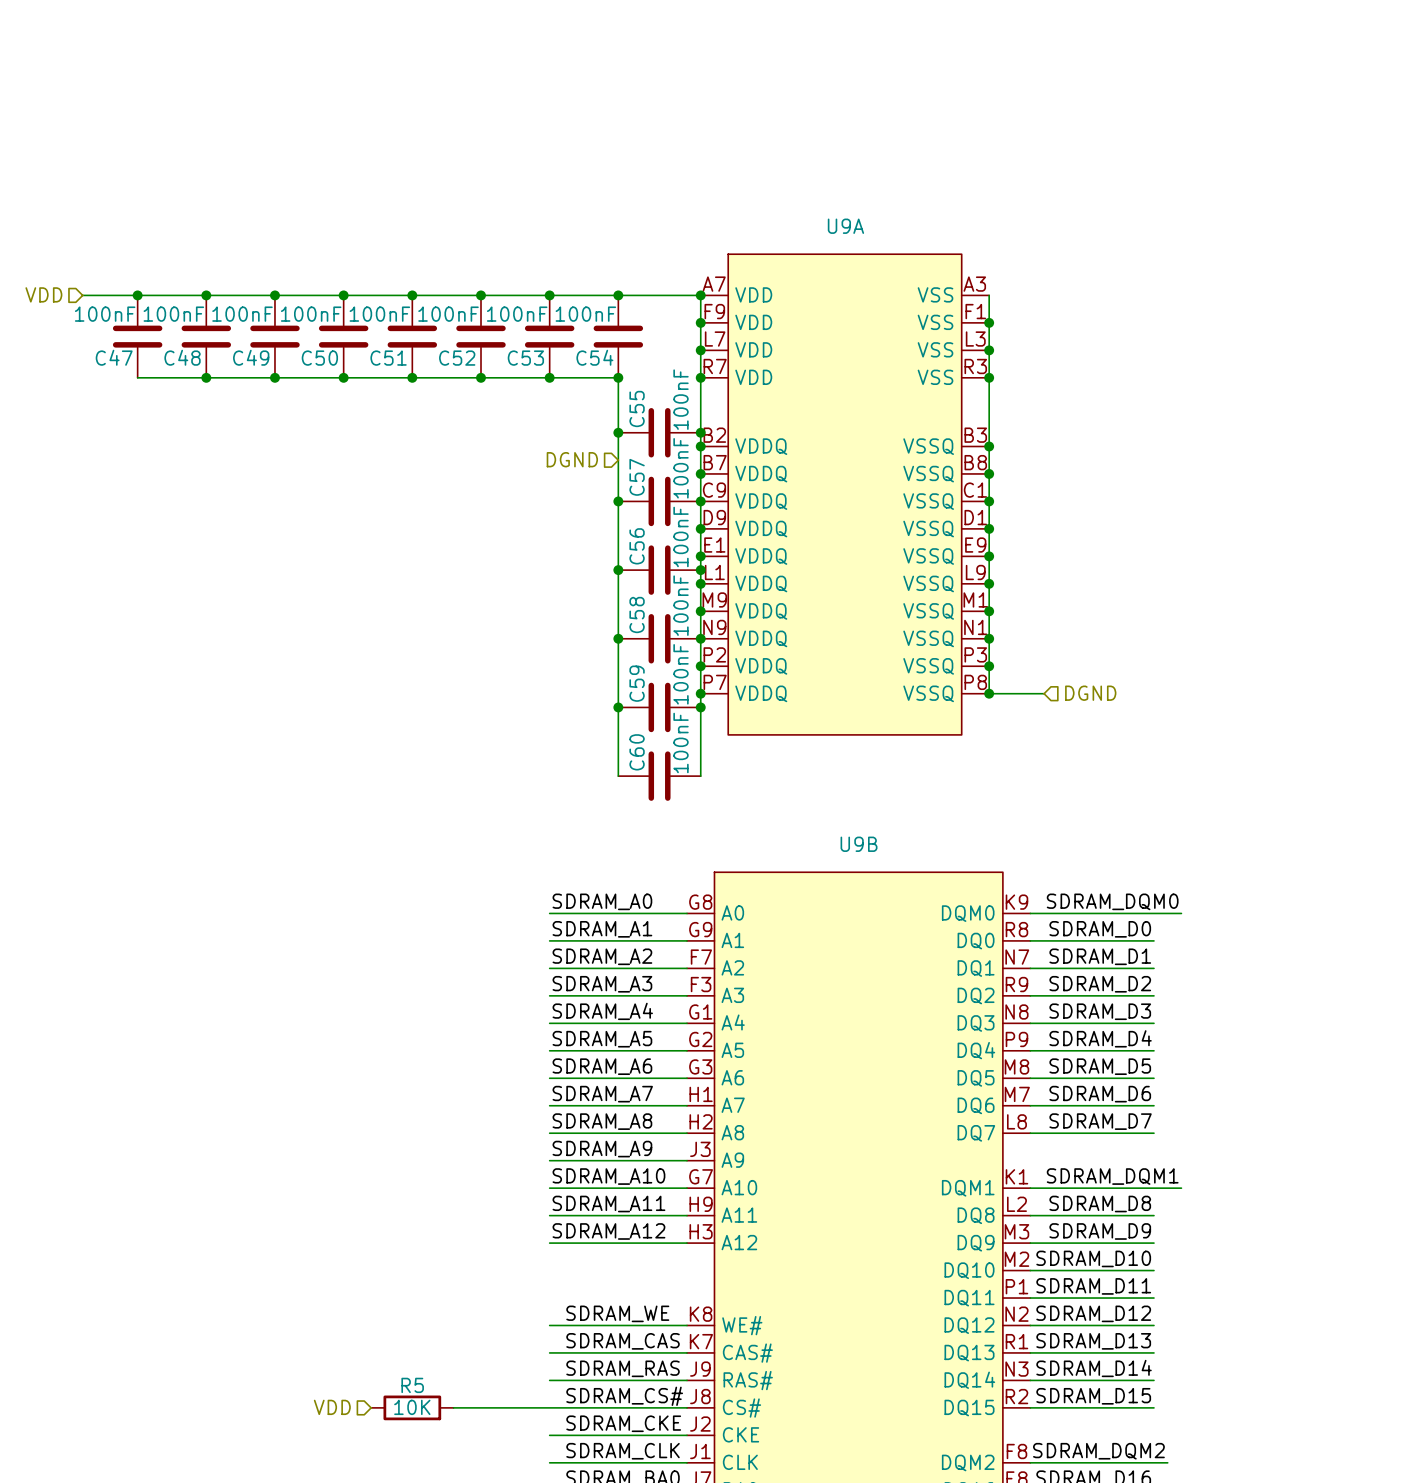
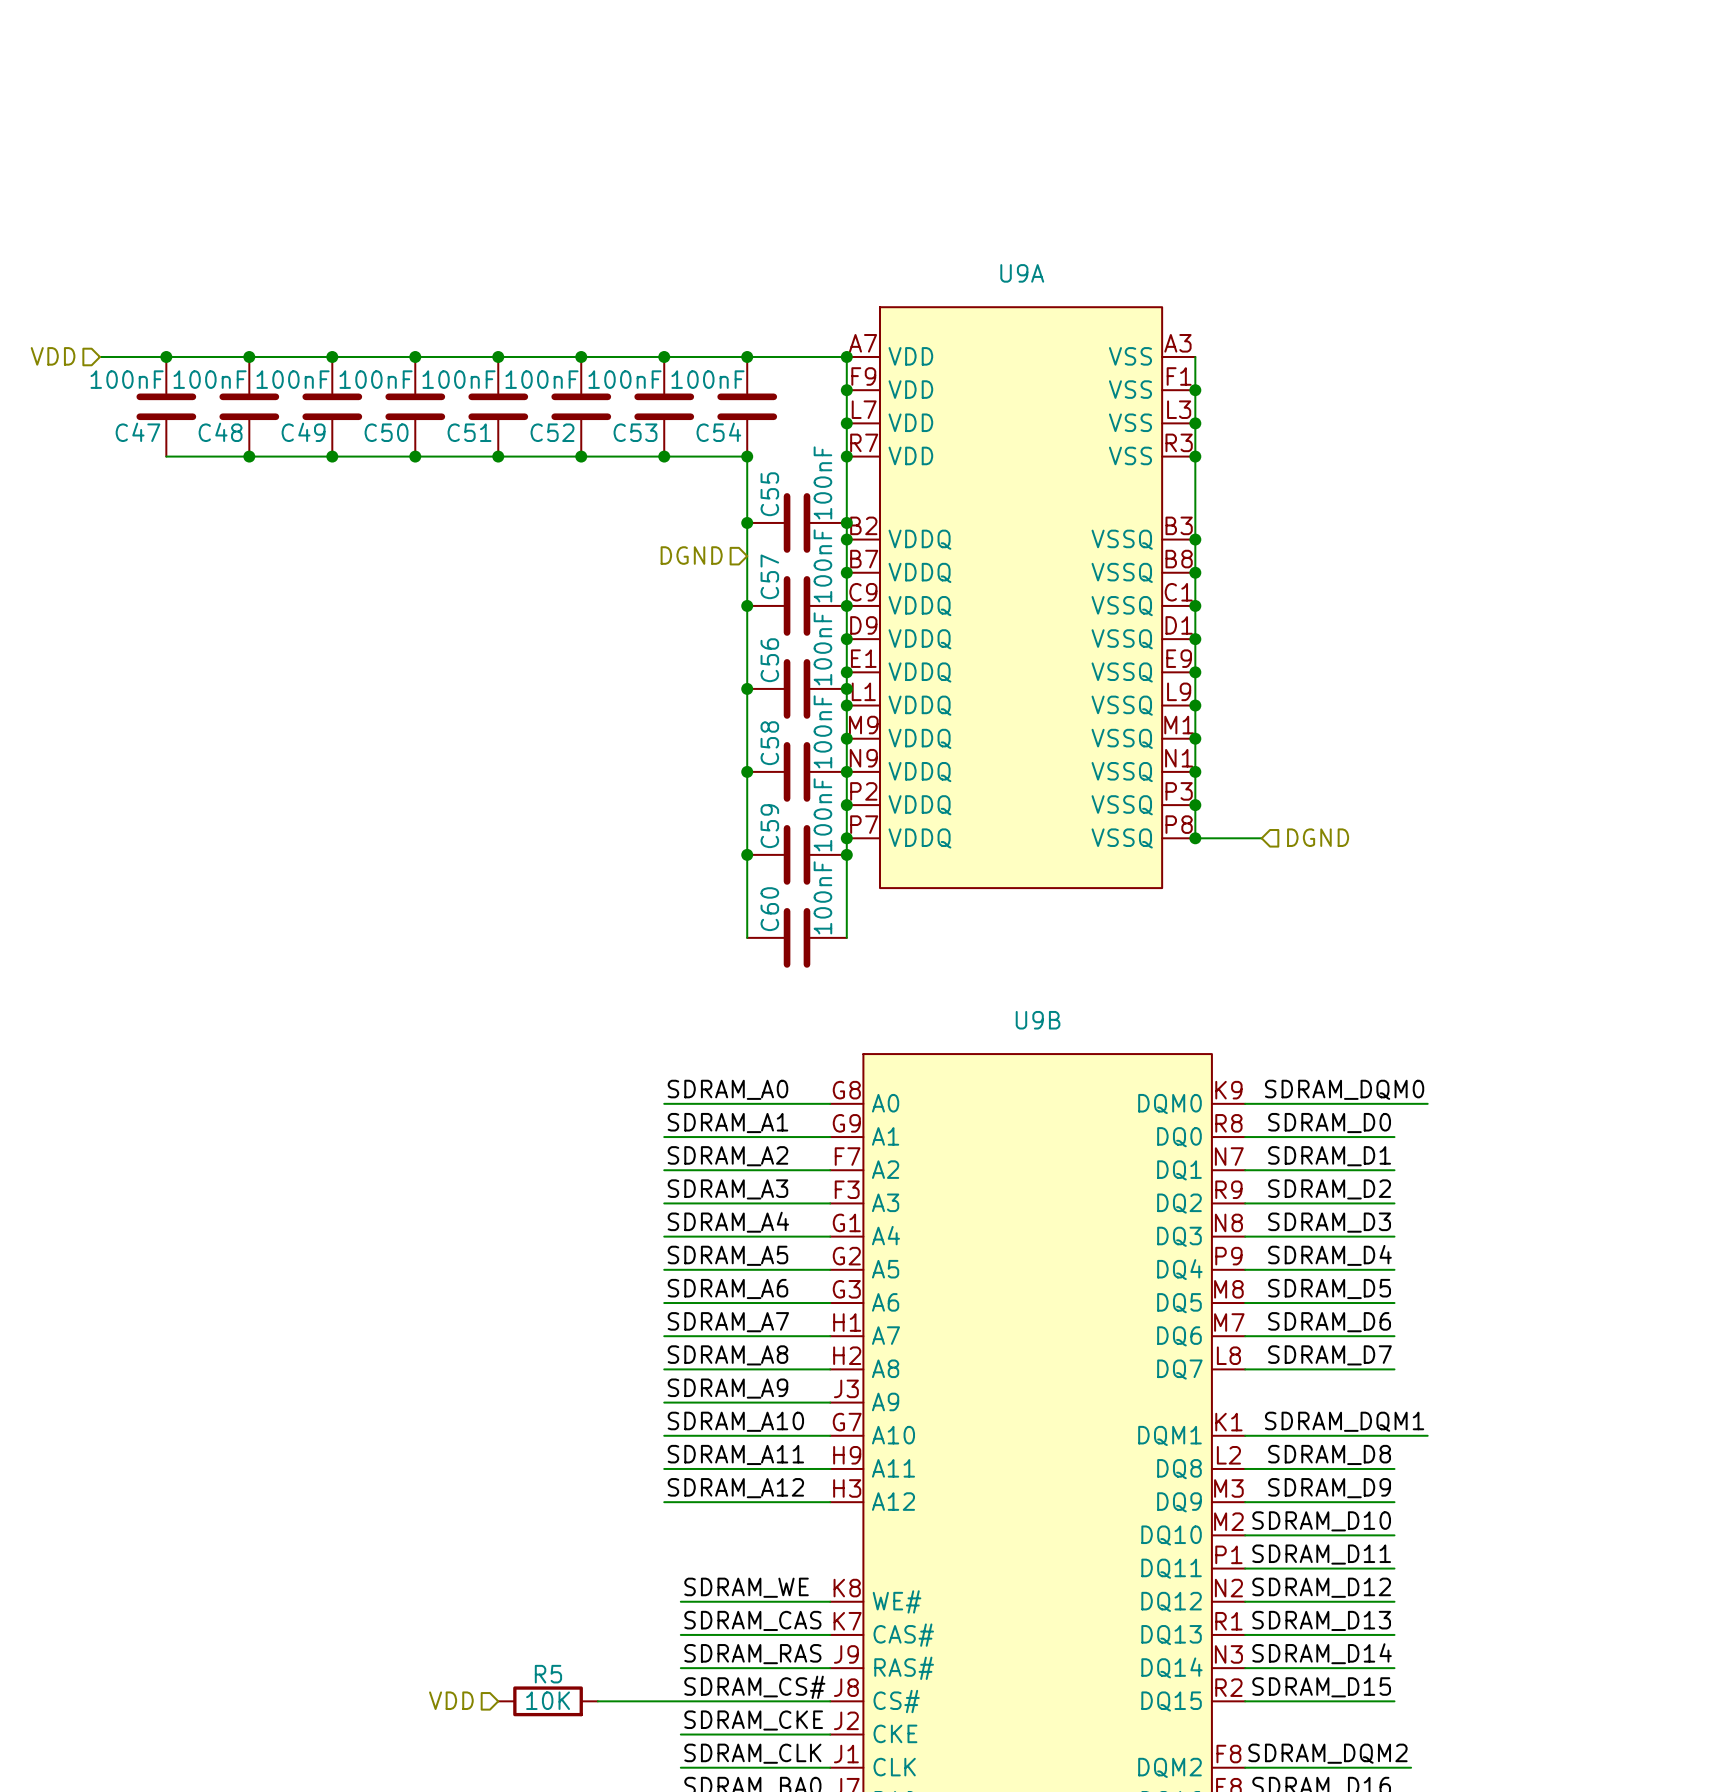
wire: (549, 1325) (563, 1325) -> none
wire: (549, 1352) (563, 1352) -> none
wire: (549, 1380) (563, 1380) -> none
hierarchical label position: VDD (332, 1407) -> VDD (451, 1700)
R5 position: (412, 1407) -> (548, 1701)
wire: (453, 1407) (494, 1407) -> none
wire: (549, 1435) (563, 1435) -> none
wire: (549, 1462) (563, 1462) -> none

